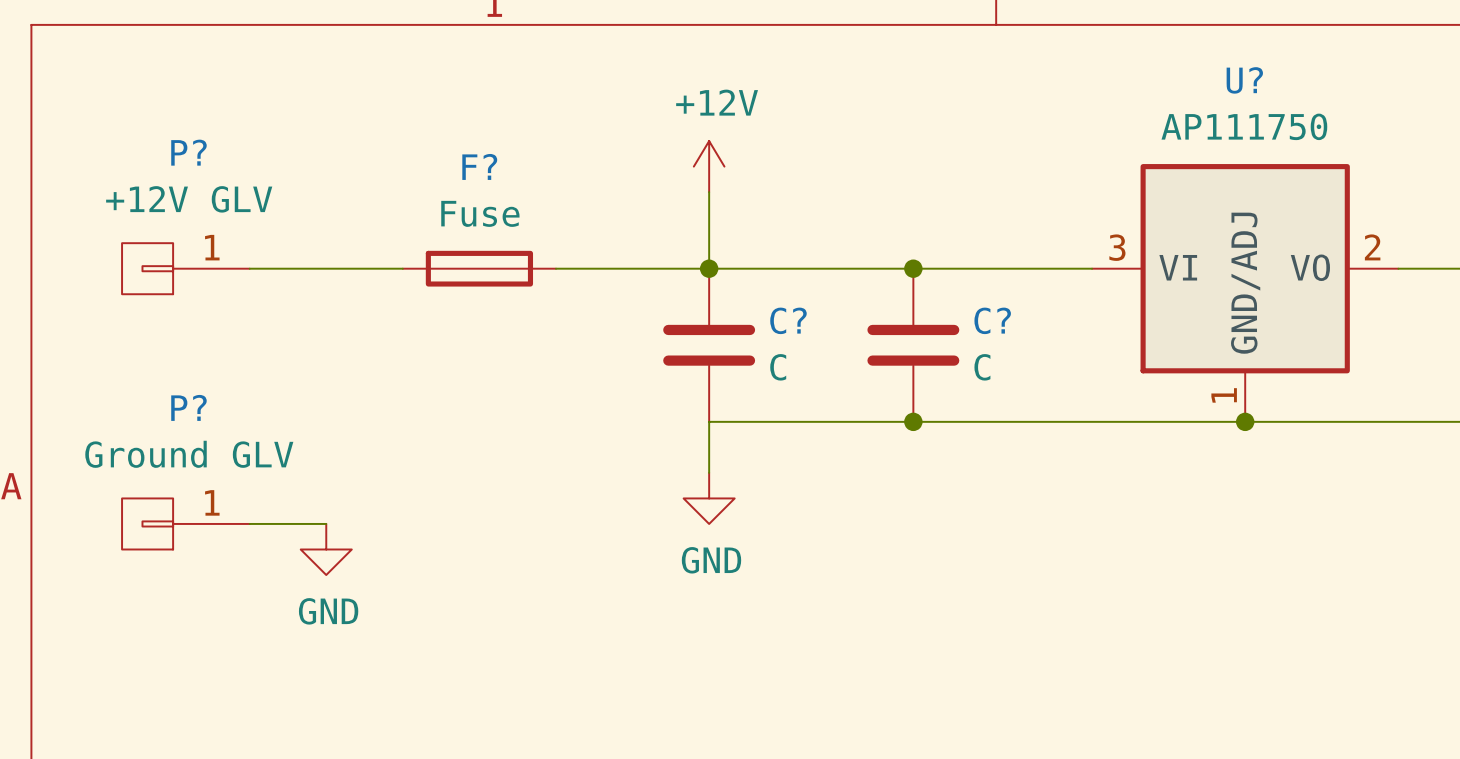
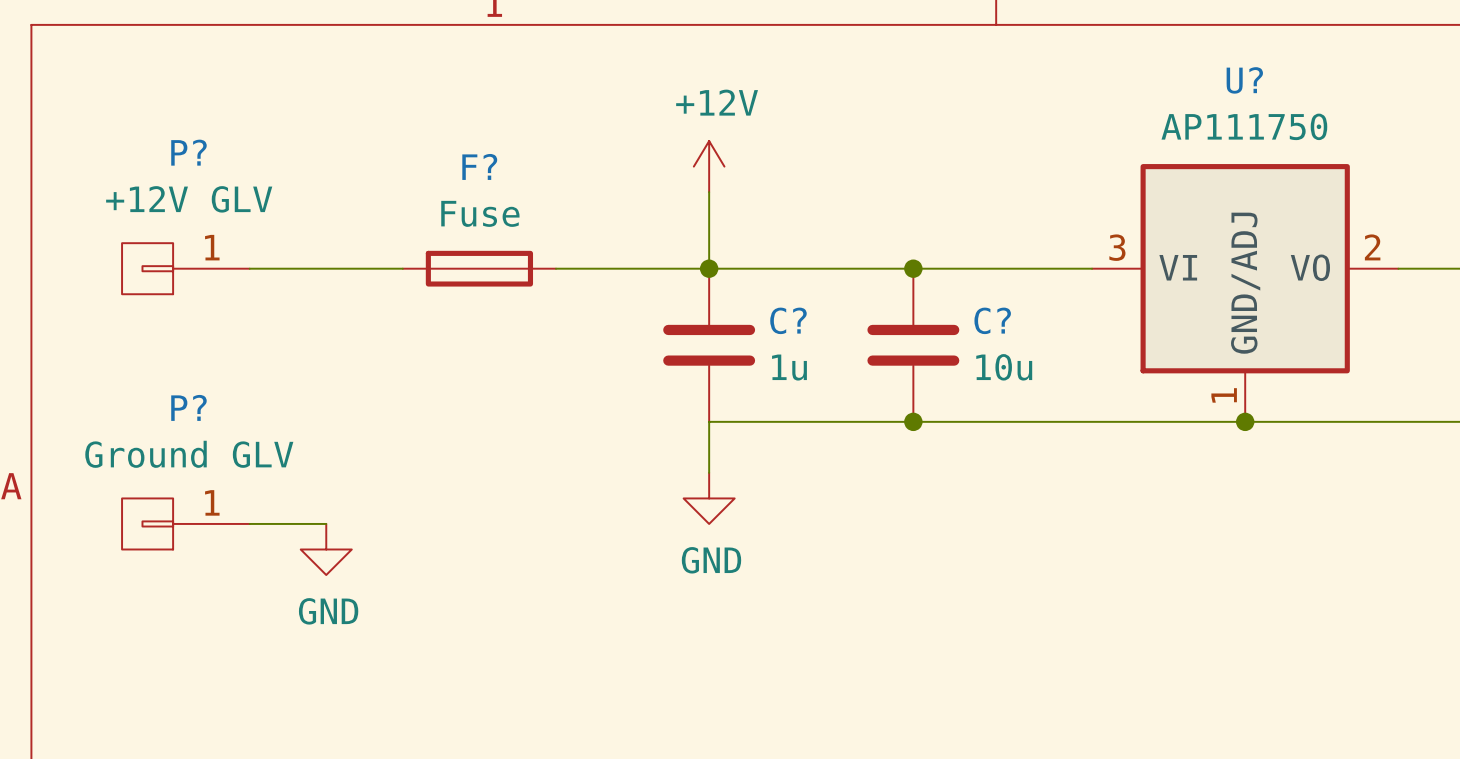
C? value: C (778, 367) -> 1u (789, 367)
C? value: C (982, 367) -> 10u (1004, 367)

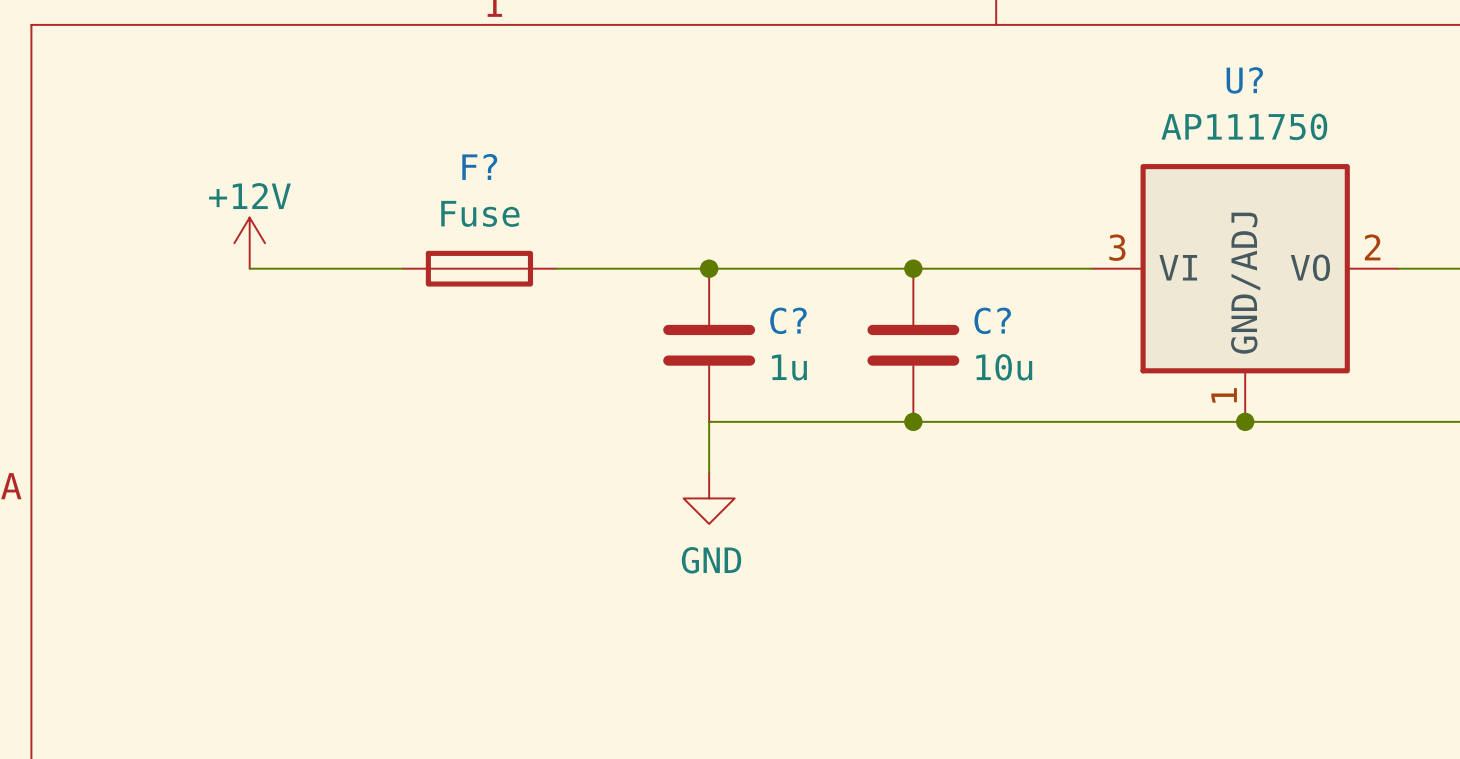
power symbol text position: +12V (717, 102) -> +12V (249, 196)
power symbol position: +12V (709, 166) -> +12V (249, 243)
wire: (709, 192) (709, 268) -> none
P?: +12V GLV (185, 268) -> none
P?: Ground GLV (185, 523) -> none
wire: (249, 523) (326, 523) -> none
power symbol: GND (326, 549) -> none

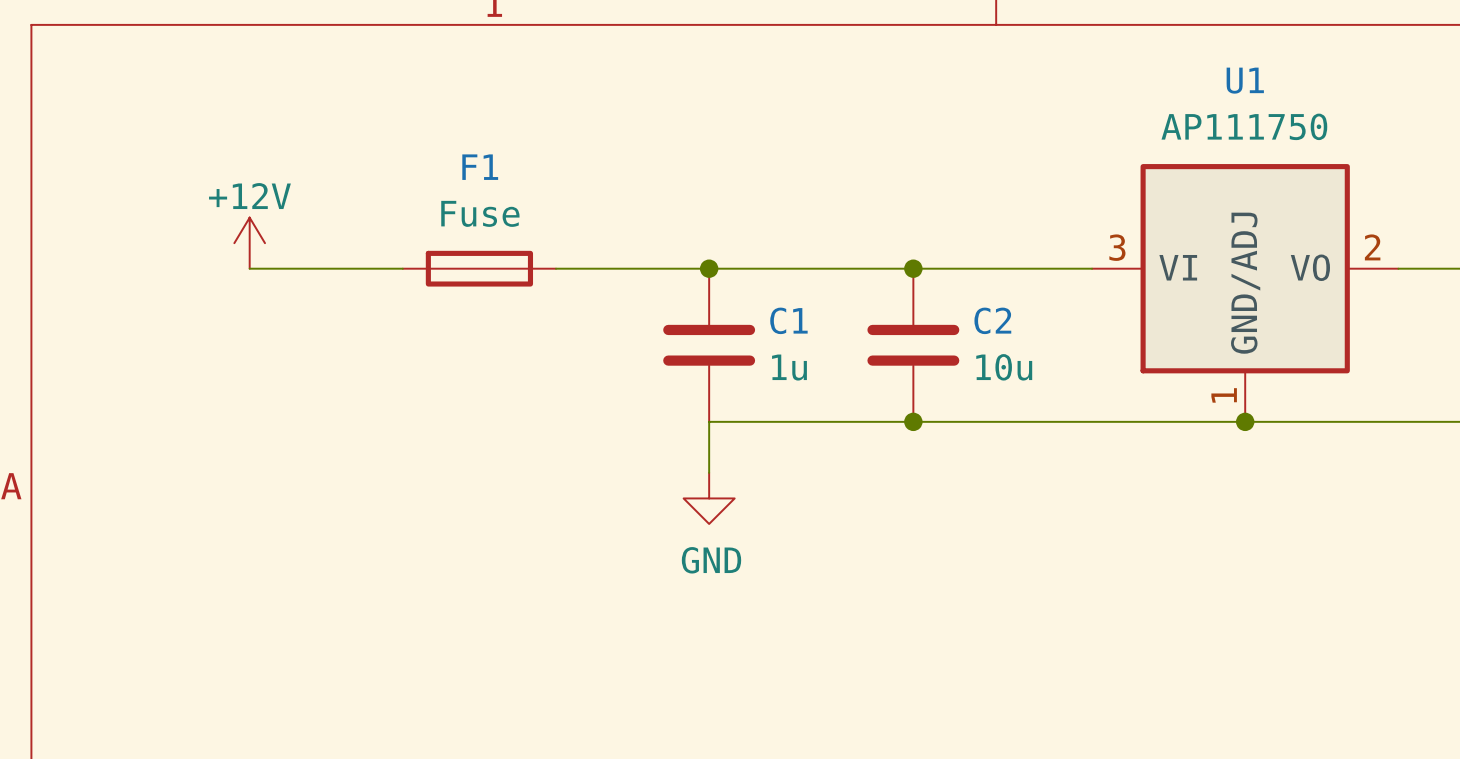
U? name: U? (1244, 80) -> U1 (1245, 80)
F? name: F? (479, 166) -> F1 (480, 167)
C? name: C? (788, 320) -> C1 (788, 320)
C? name: C? (992, 320) -> C2 (992, 320)

